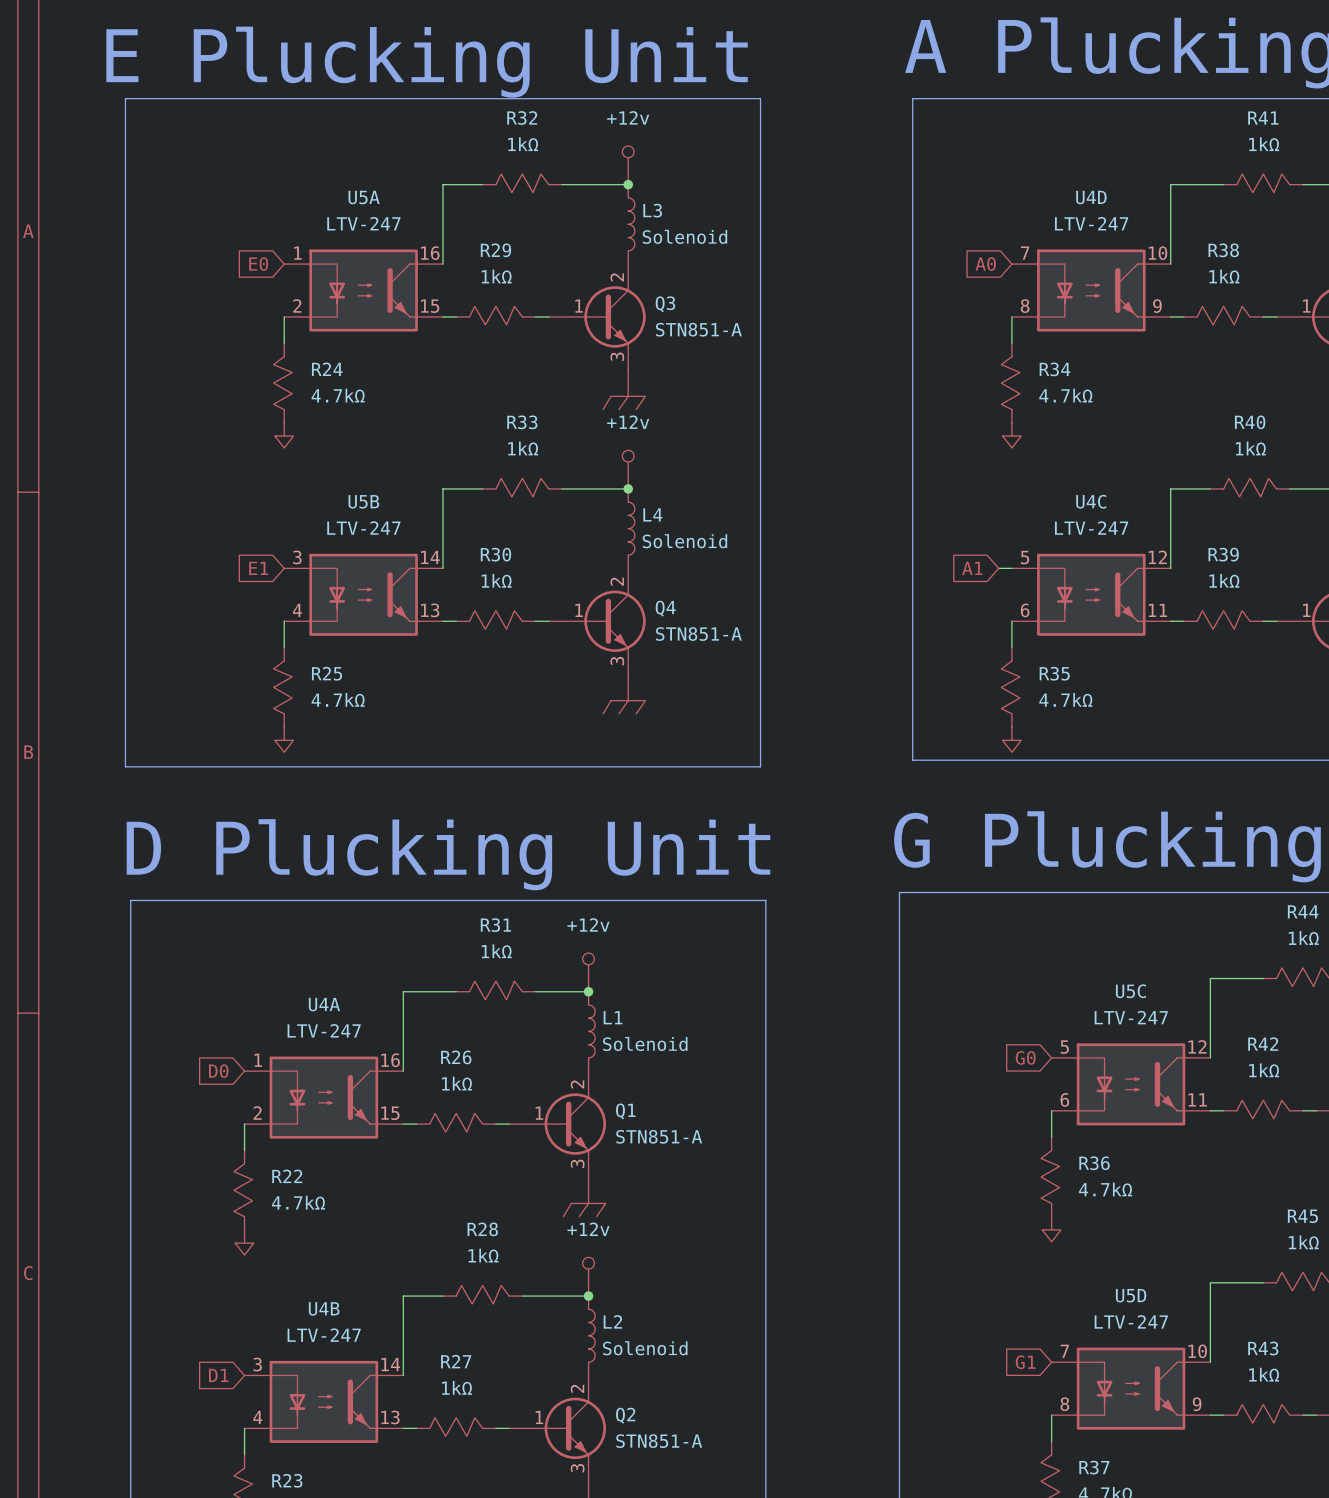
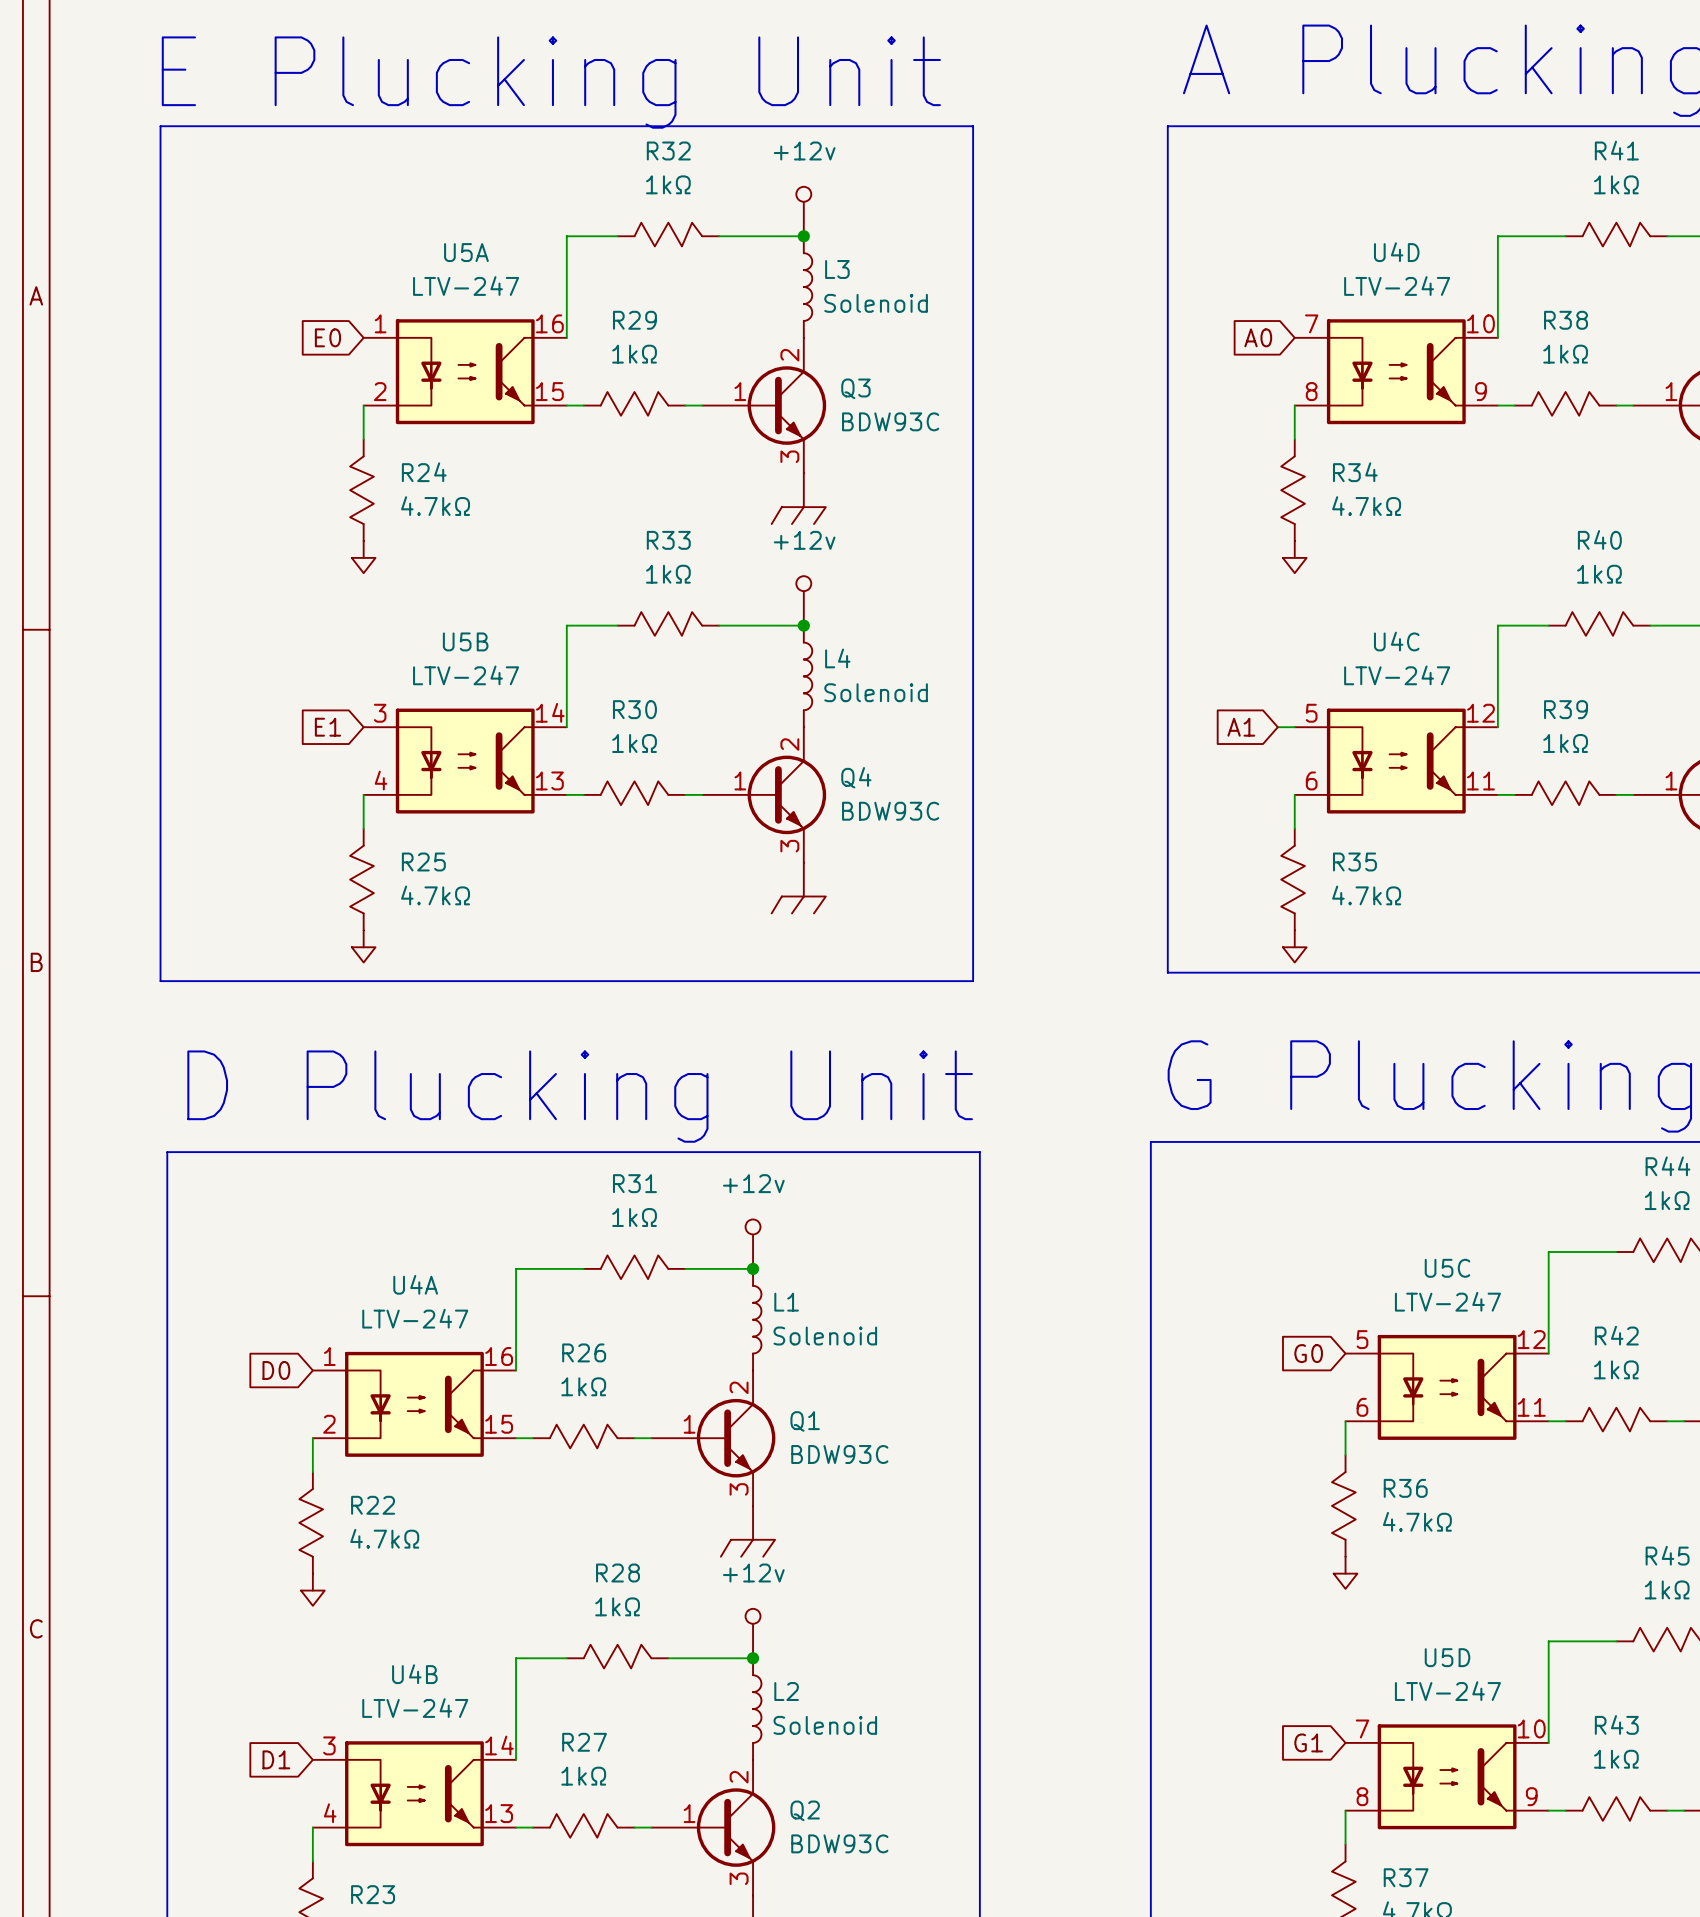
Q3 value: STN851-A (698, 329) -> BDW93C (890, 421)
Q4 value: STN851-A (698, 634) -> BDW93C (890, 811)
Q1 value: STN851-A (659, 1136) -> BDW93C (839, 1454)
Q2 value: STN851-A (659, 1441) -> BDW93C (839, 1843)

